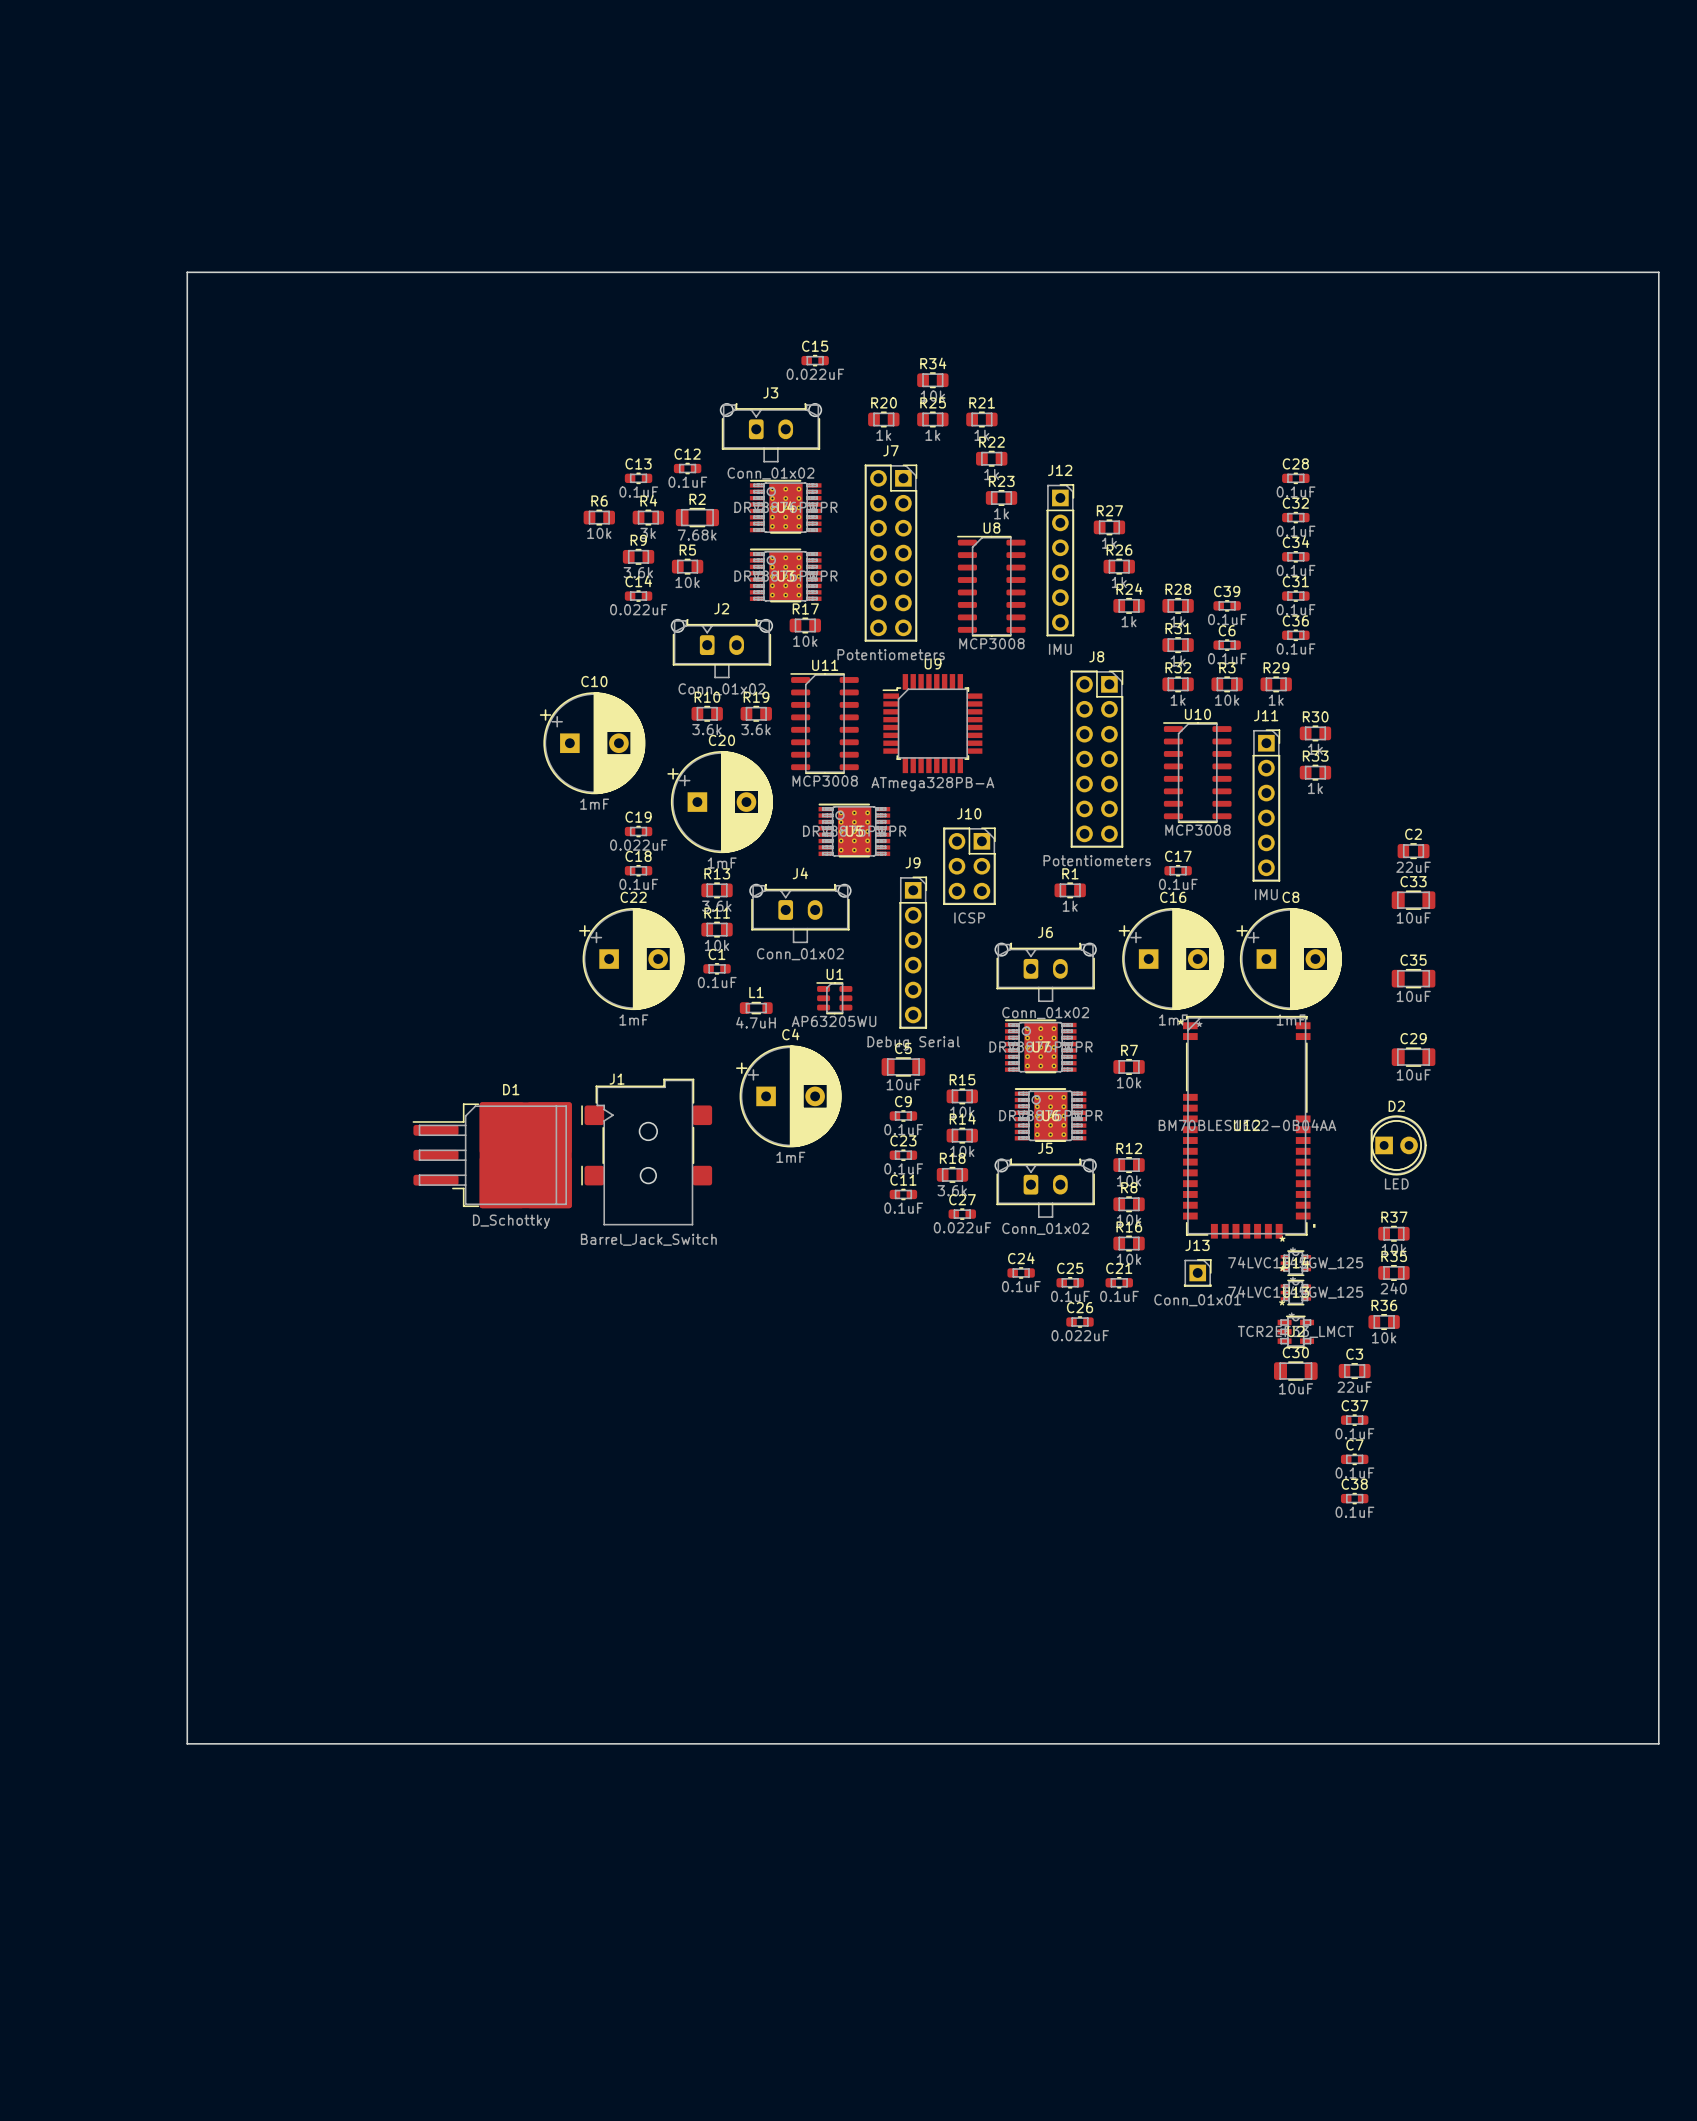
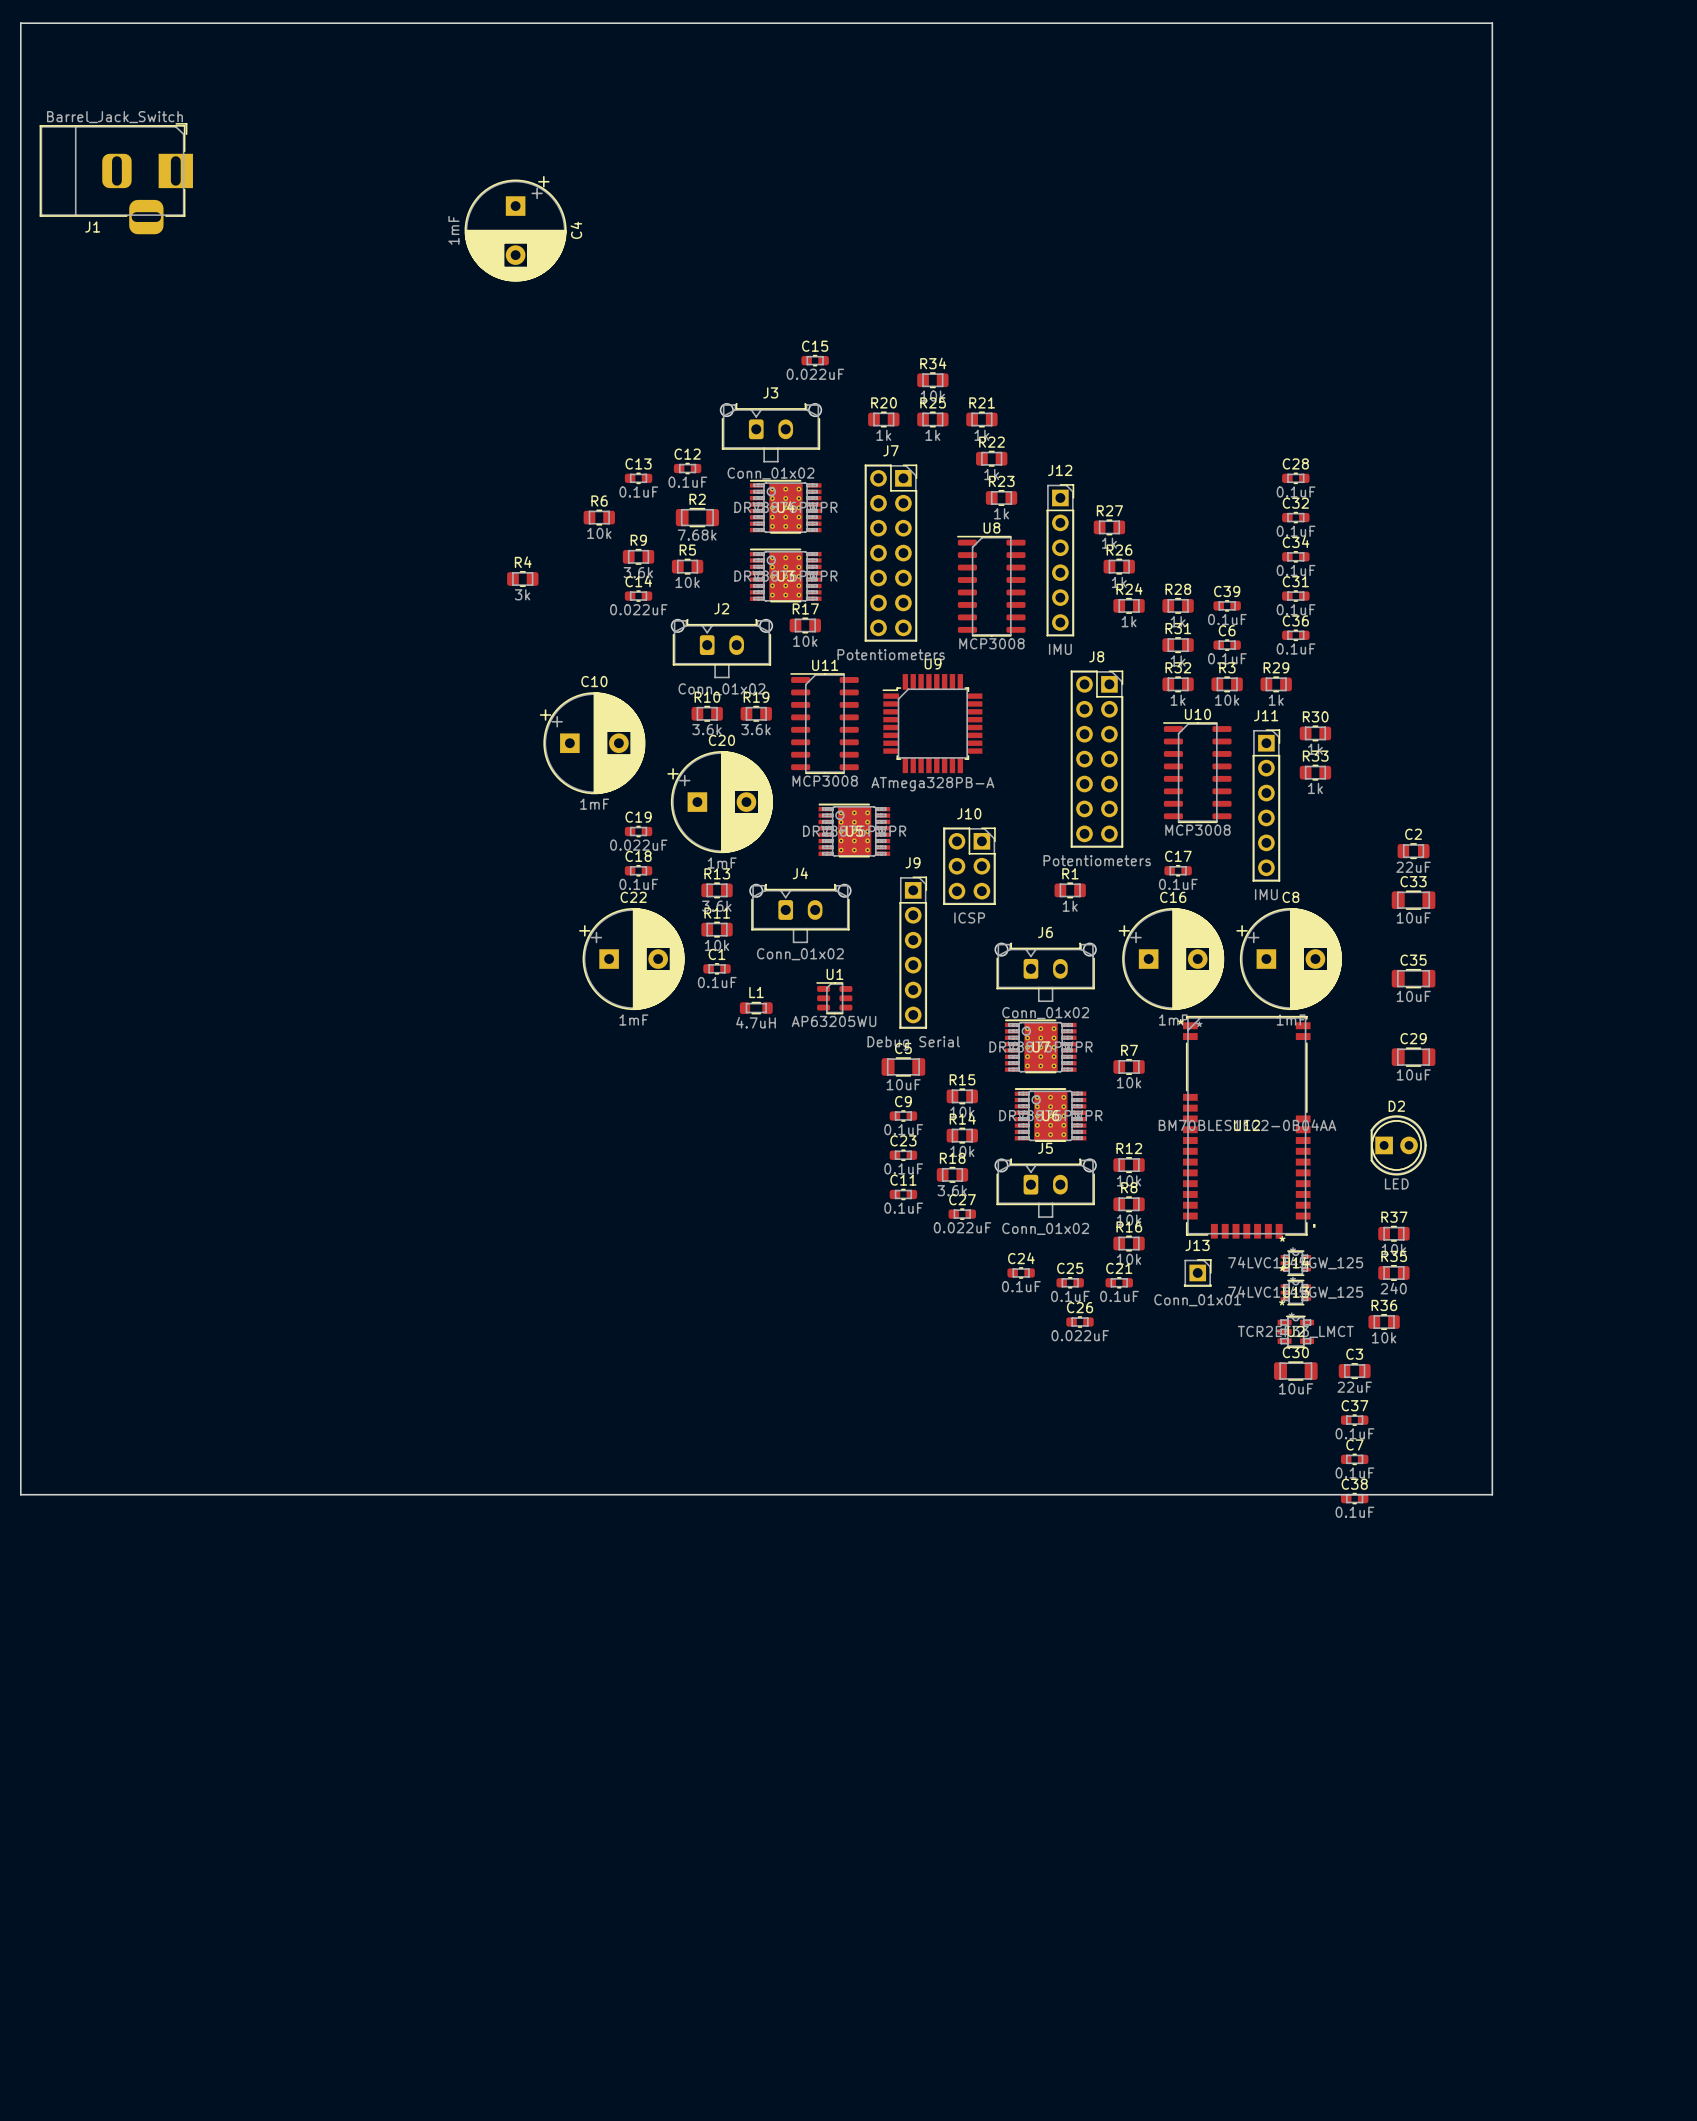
board edge: (187, 272) (1658, 272) (1658, 1743) (187, 1743) (187, 272) -> (20, 23) (20, 1494) (1492, 1494) (1492, 23) (20, 23)
R4 position: (648, 517) -> (522, 578)
J1 footprint: [581, 1078, 713, 1226] -> [39, 123, 193, 235]
J1 name position: J1 (617, 1079) -> J1 (92, 227)
C4 rotation: 0° (788, 1096) -> 90° clockwise (515, 228)
C4 position: (788, 1096) -> (515, 228)
D1: D_Schottky (492, 1155) -> none
J1 value position: Barrel_Jack_Switch (648, 1239) -> Barrel_Jack_Switch (114, 117)

